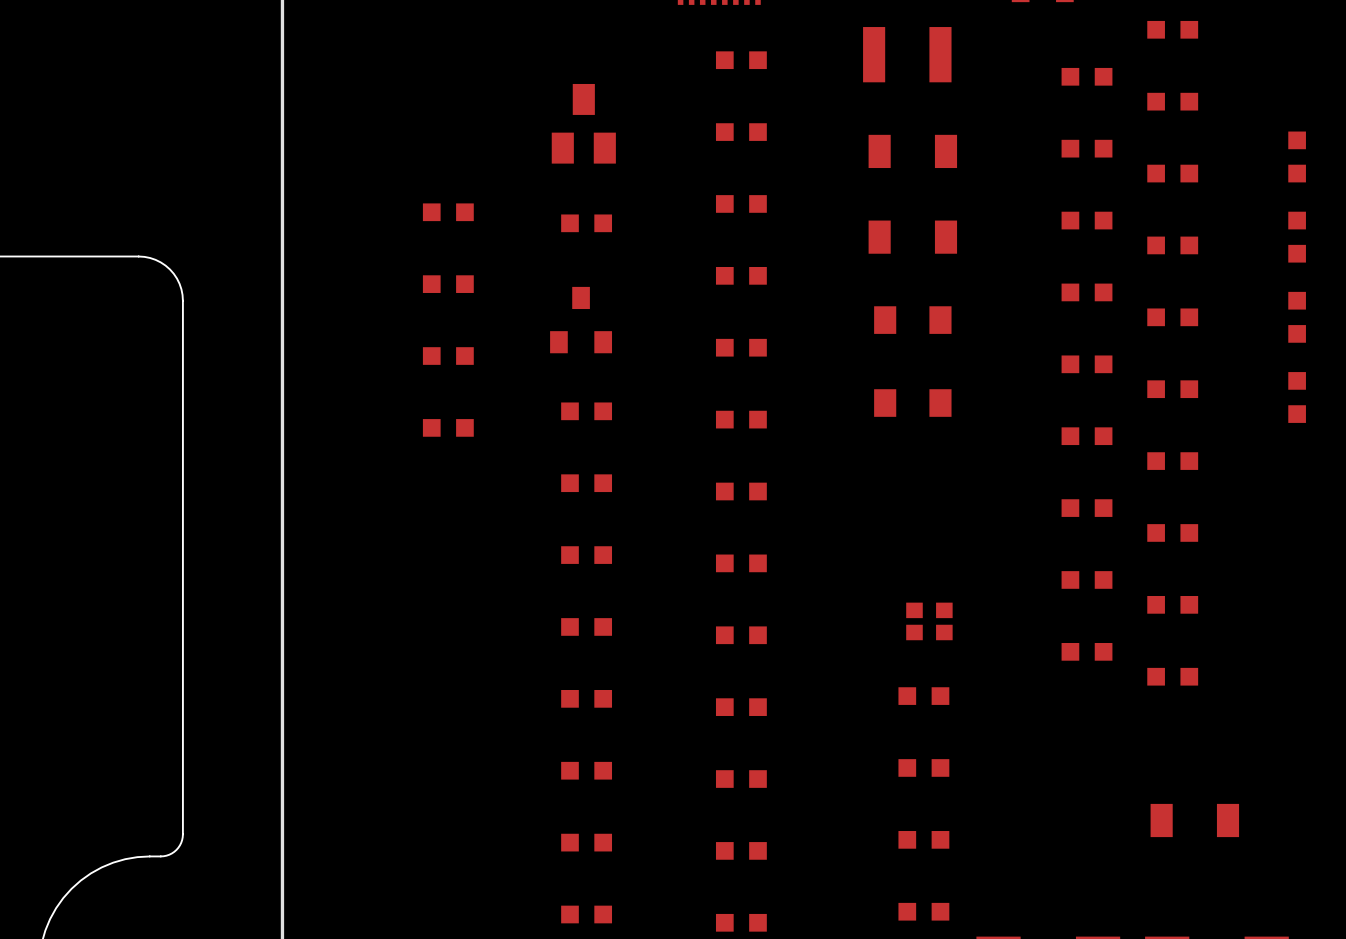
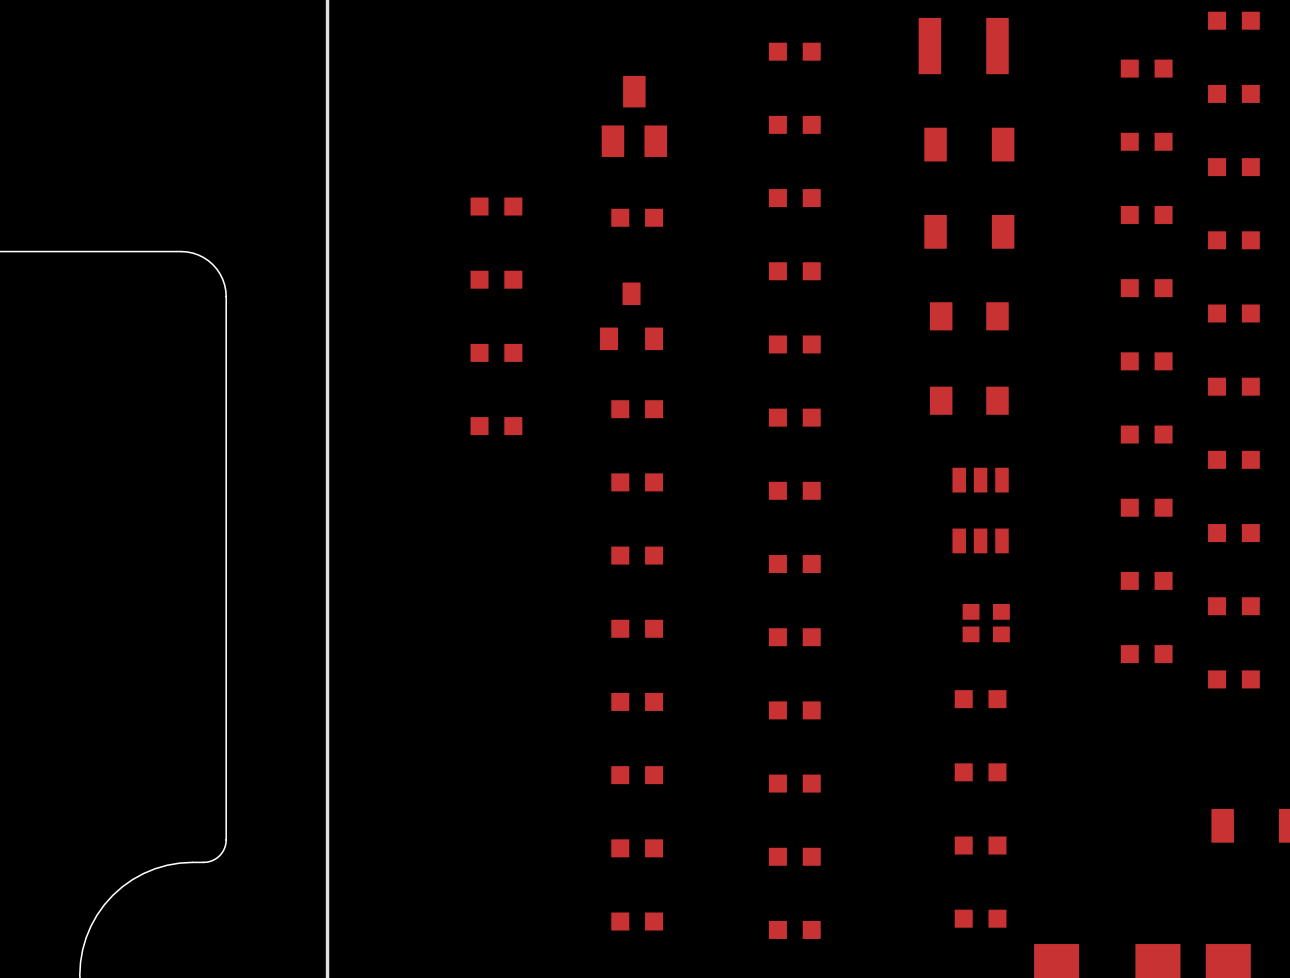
part: none -> (980, 510)

